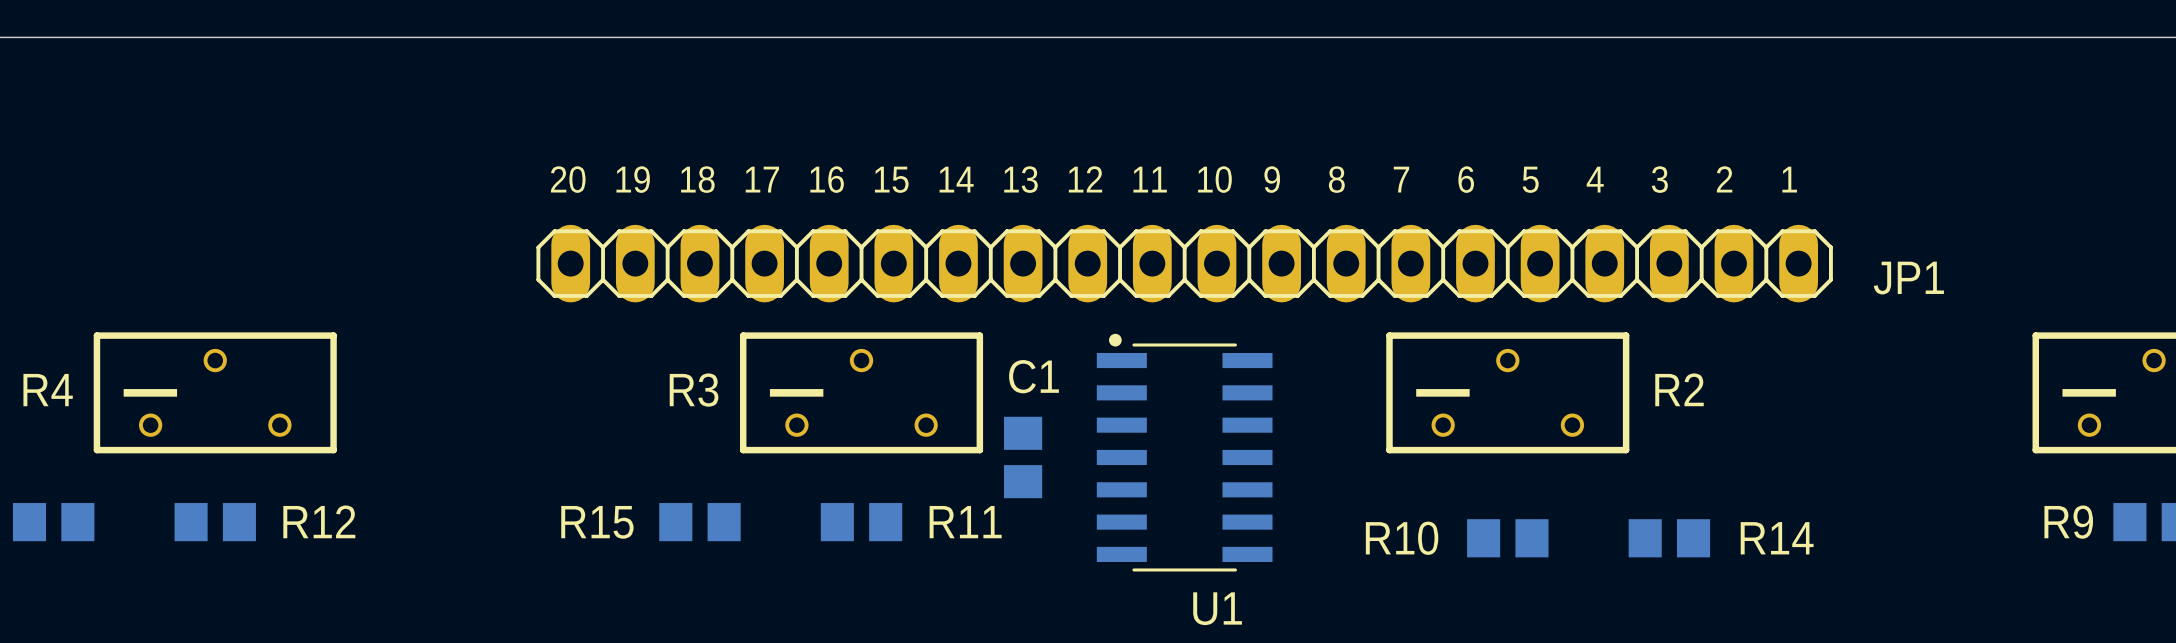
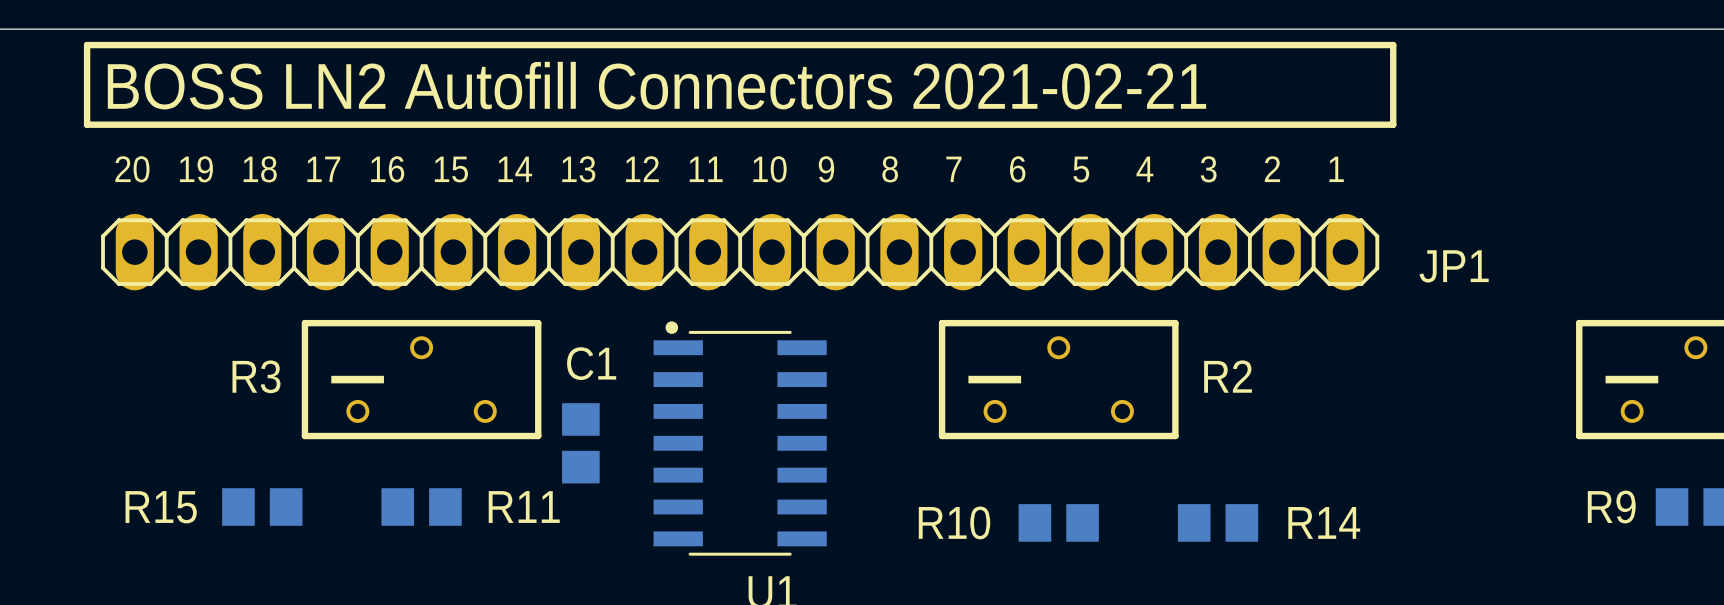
line: none -> (1393, 45) (1393, 124) (87, 124) (87, 45) (1393, 45)
text: none -> BOSS LN2 Autofill Connectors 2021-02-21 (656, 85)

